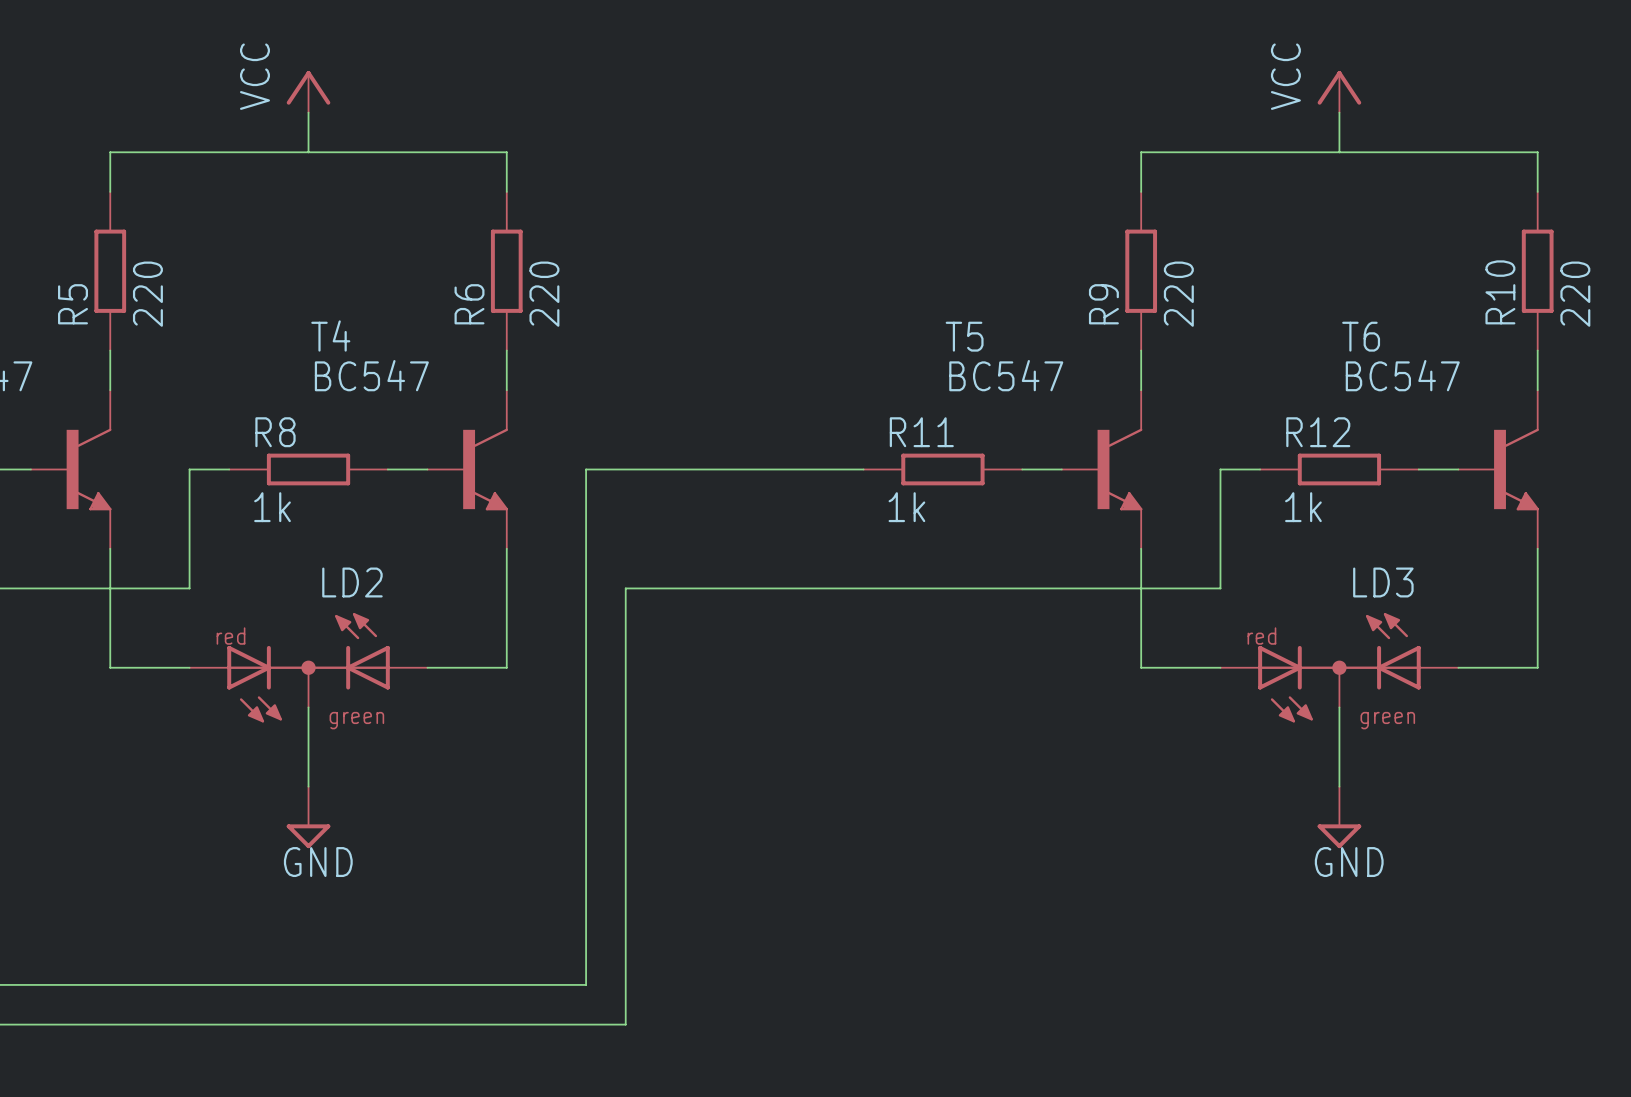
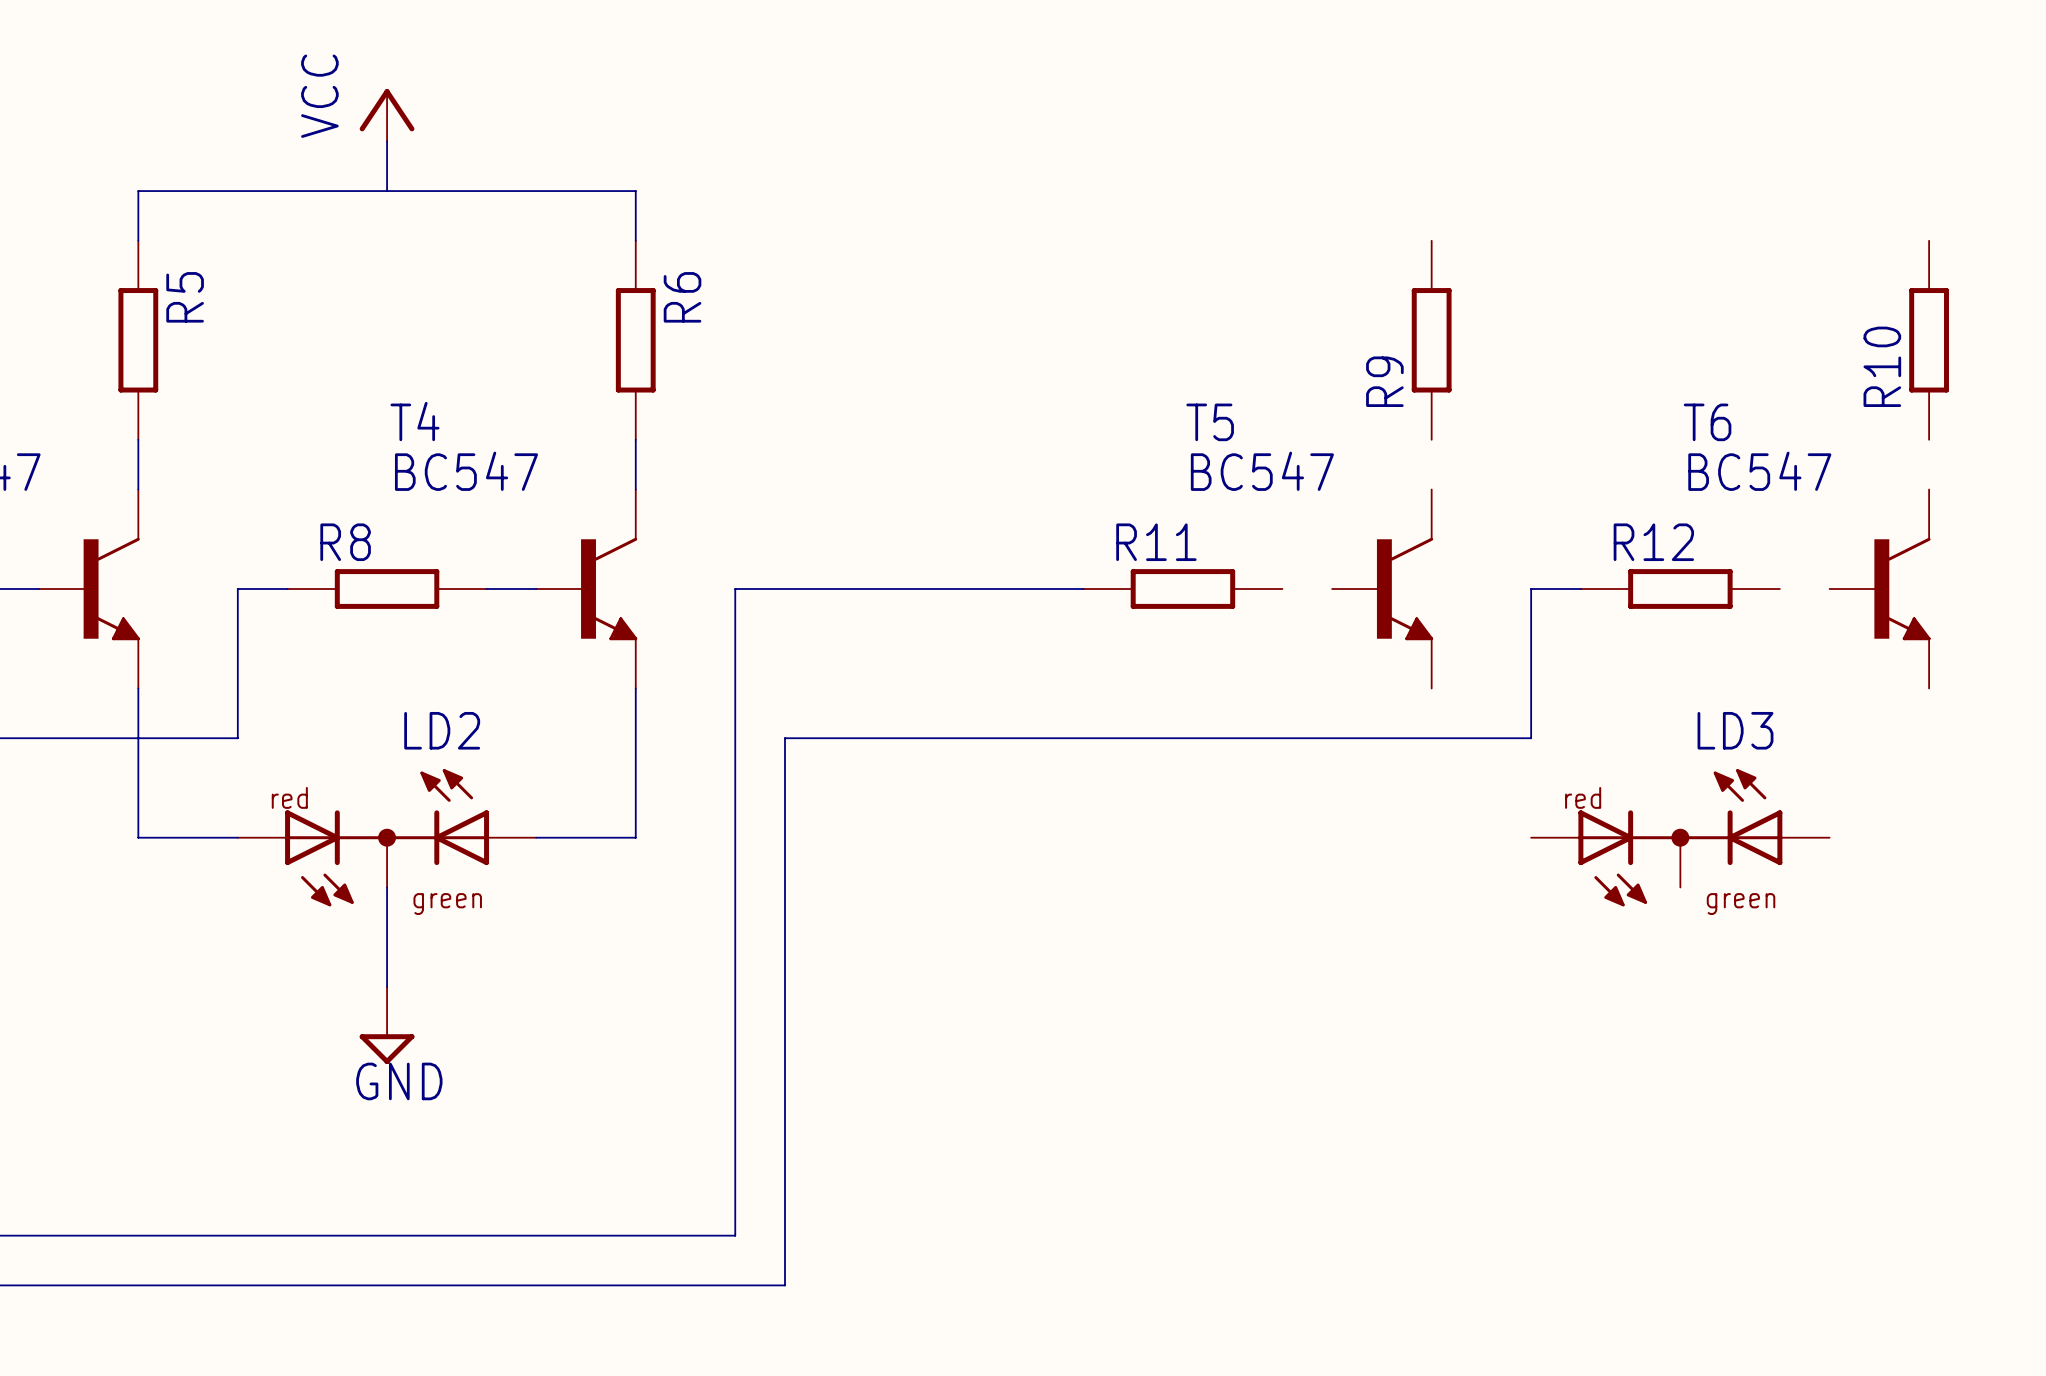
power symbol: VCC (1339, 91) -> none
wire: (1339, 112) (1339, 152) -> none
wire: (1141, 191) (1141, 152) (1537, 152) (1537, 191) -> none
R5 value: 220 (147, 294) -> none
R6 value: 220 (544, 294) -> none
R9 value: 220 (1178, 294) -> none
R10 value: 220 (1575, 294) -> none
R5 name position: R5 (72, 304) -> R5 (185, 297)
R6 name position: R6 (469, 304) -> R6 (682, 297)
wire: (1141, 350) (1141, 390) -> none
wire: (1537, 350) (1537, 390) -> none
wire: (1022, 469) (1061, 469) -> none
wire: (1418, 469) (1458, 469) -> none
R8 value: 1k (272, 507) -> none
R11 value: 1k (906, 507) -> none
R12 value: 1k (1303, 507) -> none
wire: (1141, 548) (1141, 667) (1220, 667) -> none
wire: (1537, 548) (1537, 667) (1458, 667) -> none
wire: (1339, 707) (1339, 786) -> none
power symbol: GND (1339, 817) -> none

